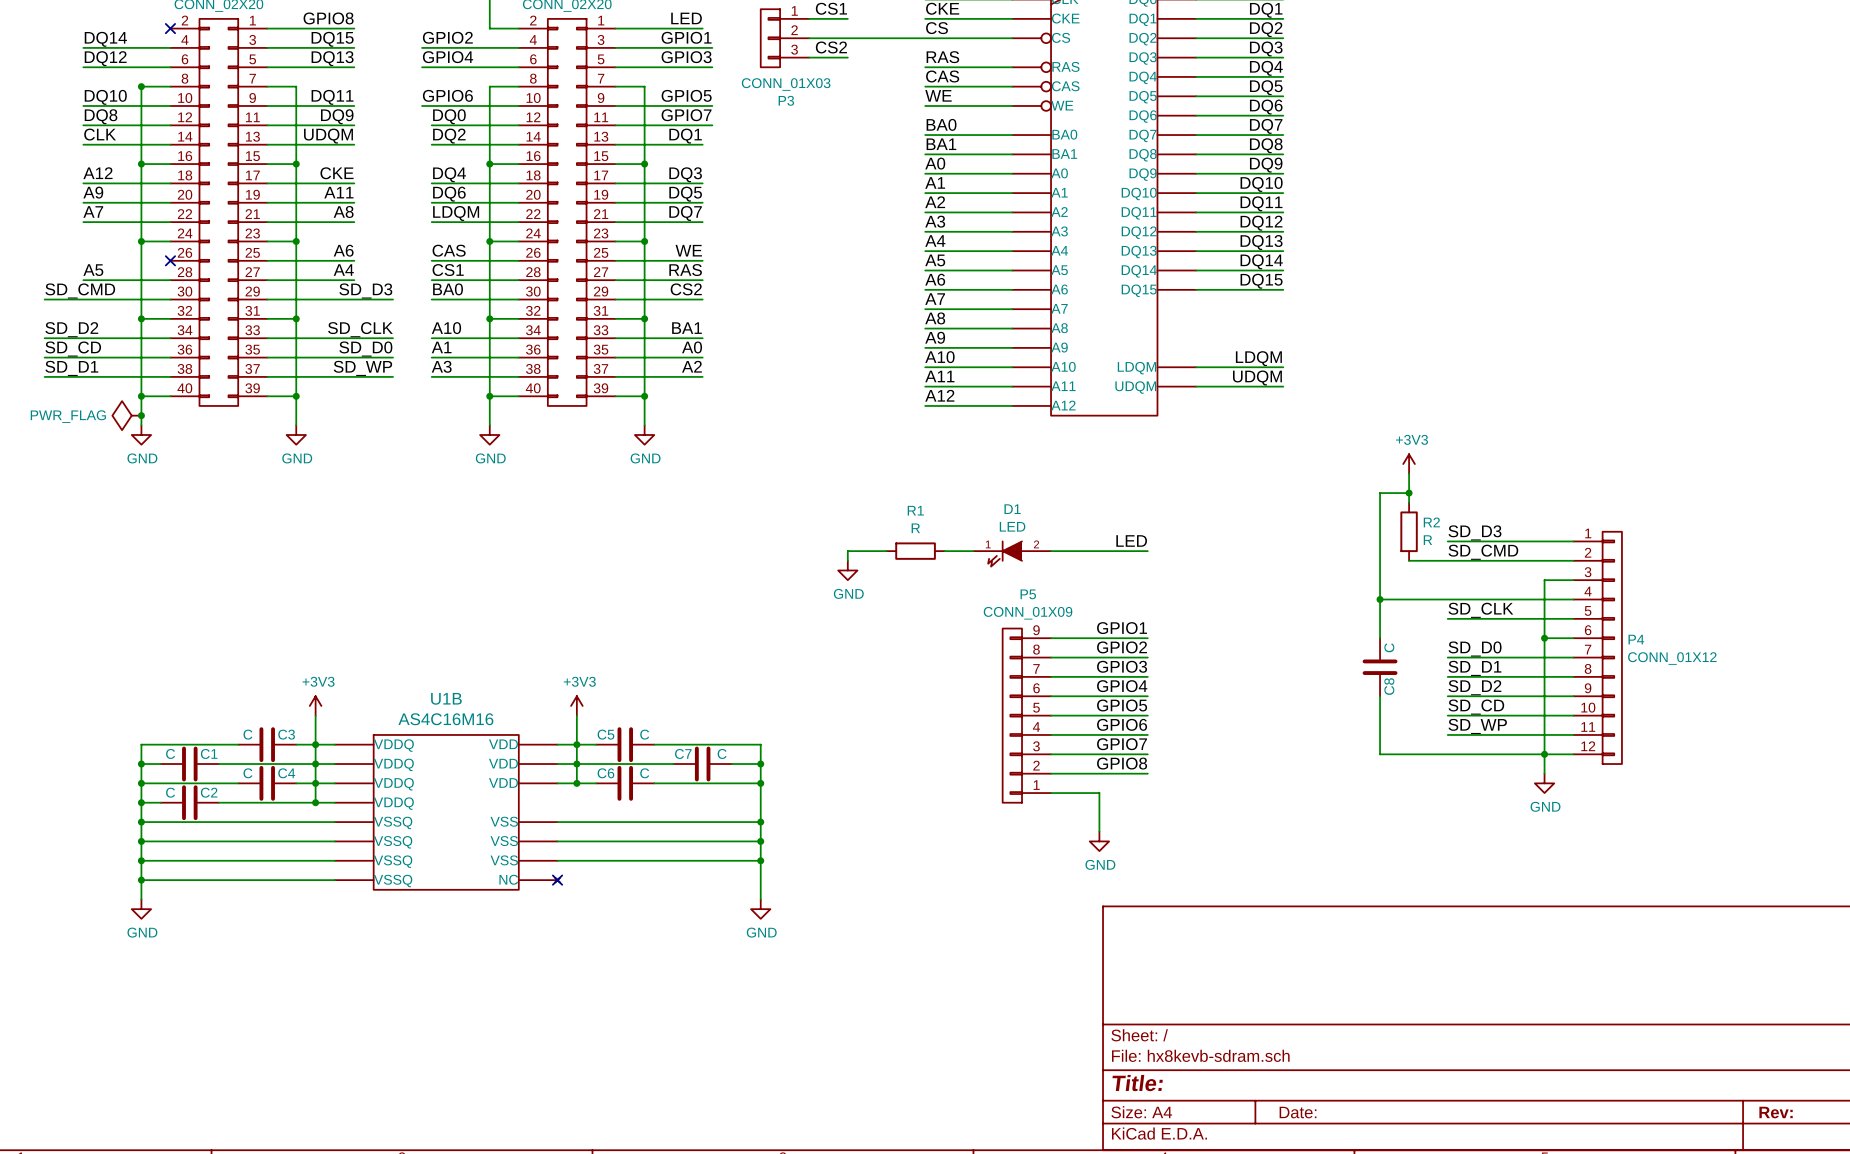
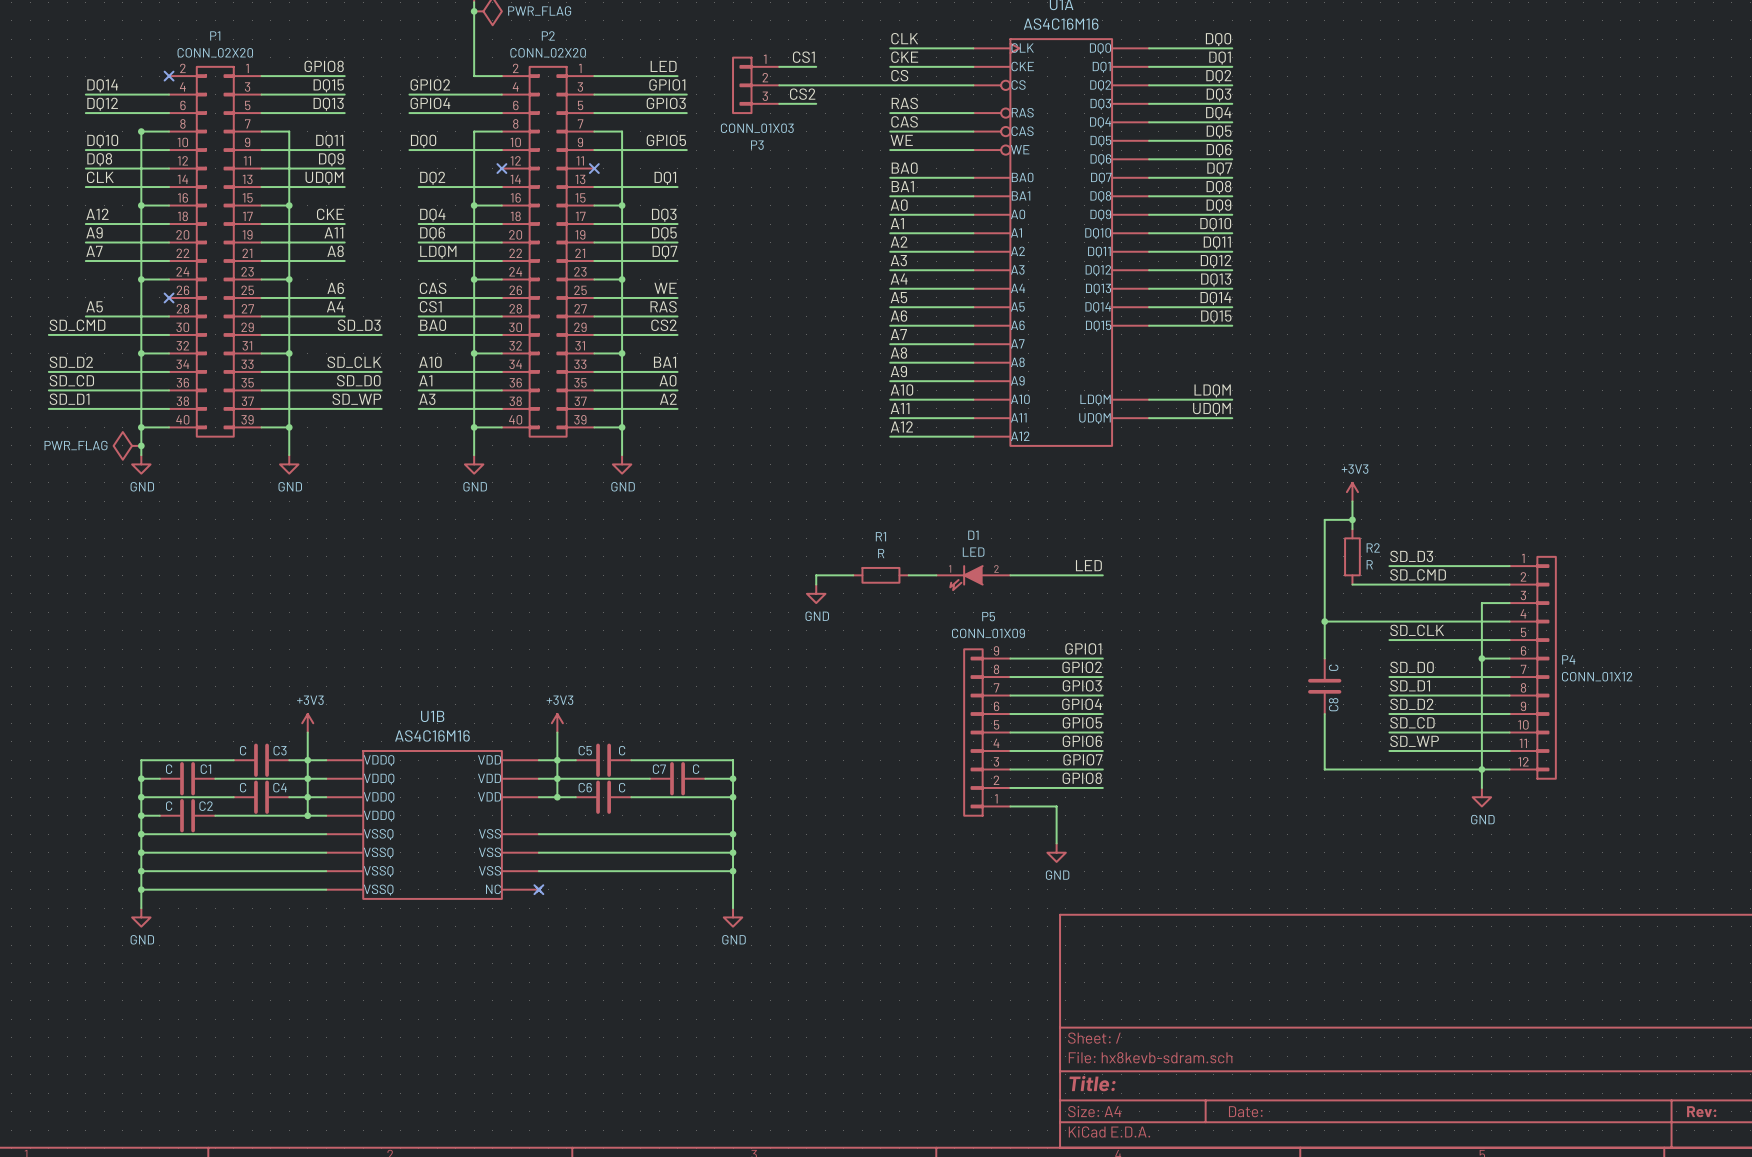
label: GPIO6 (447, 95) -> DQ0 (423, 141)
label: GPIO7 (686, 115) -> none
label: DQ0 (449, 116) -> none
wire: (431, 125) (518, 125) -> none
no-connect mark: none -> (501, 168)
wire: (615, 125) (712, 125) -> none
no-connect mark: none -> (594, 168)

